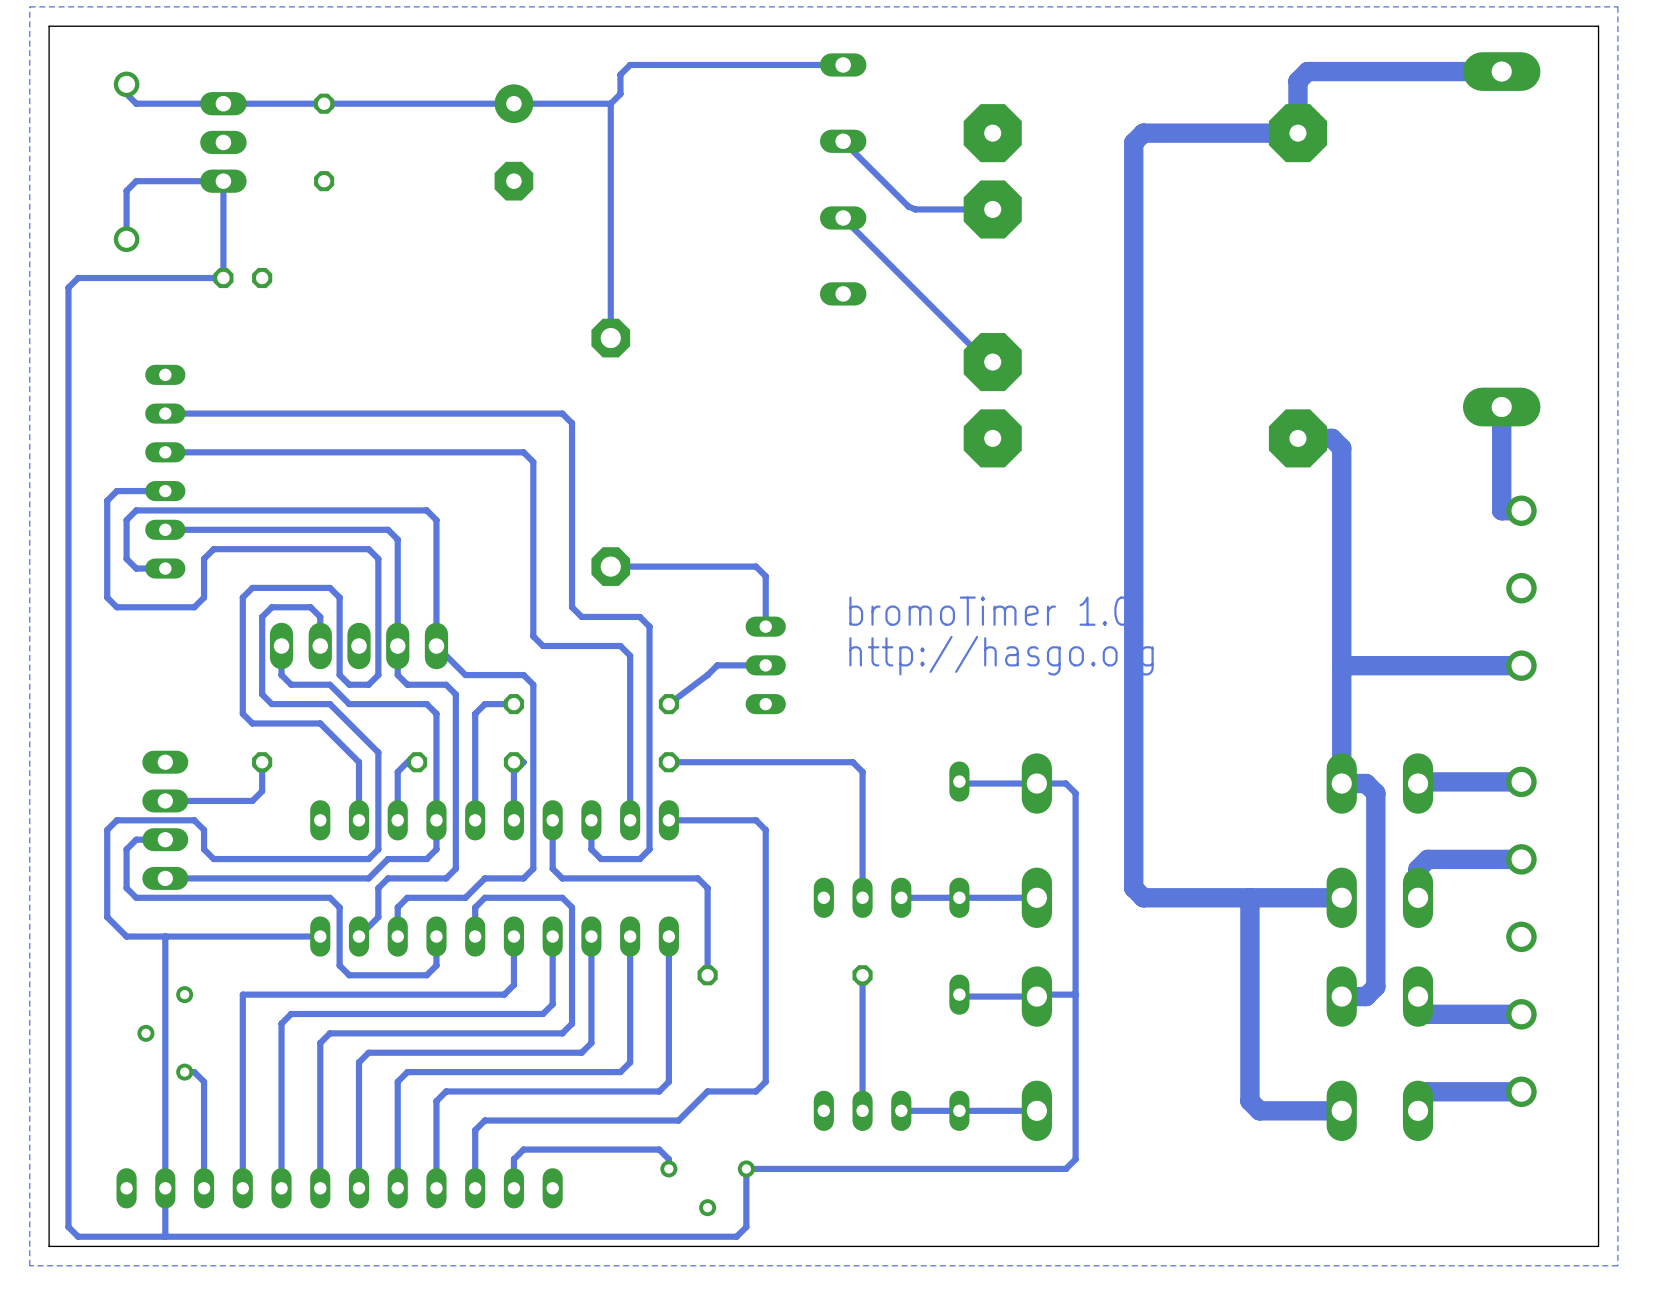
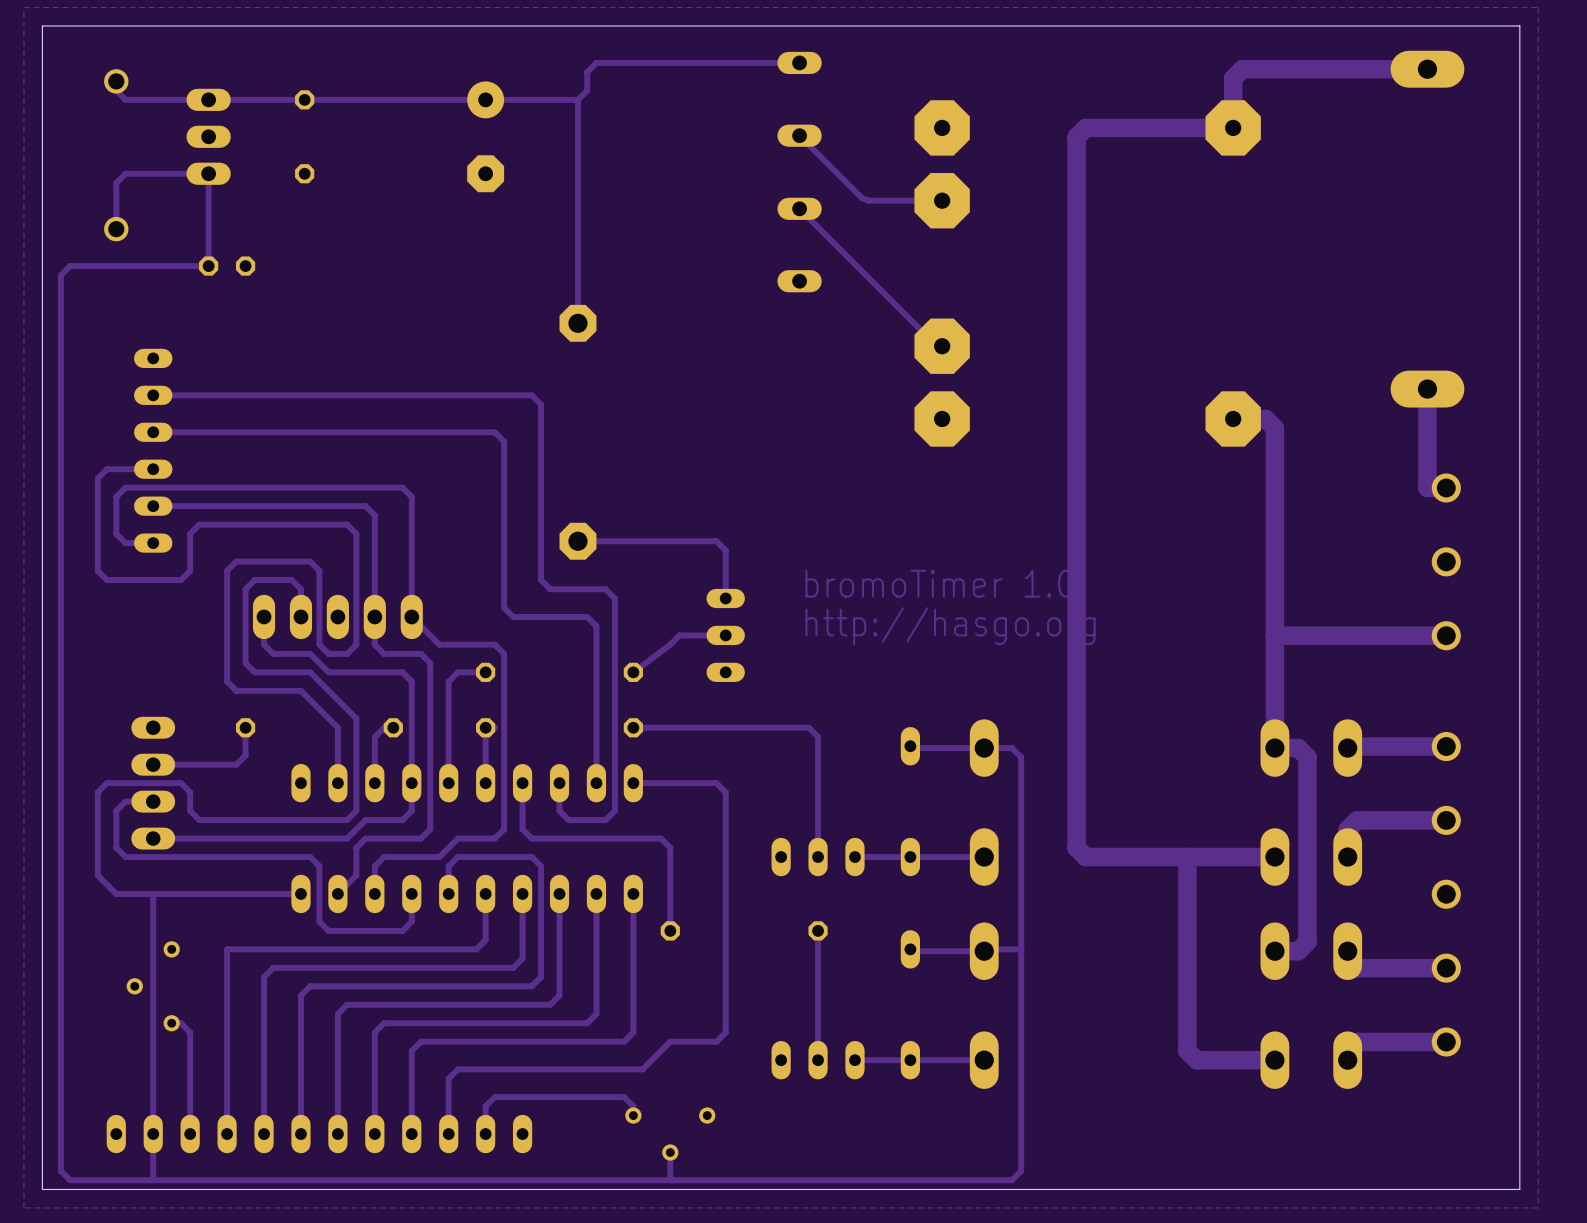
track: (1075, 1159) (1065, 1168) (746, 1168) (746, 1227) (736, 1236) -> (1021, 1106) (1021, 1170) (1011, 1180) (698, 1180)
track: none -> (670, 1152) (670, 1180)

